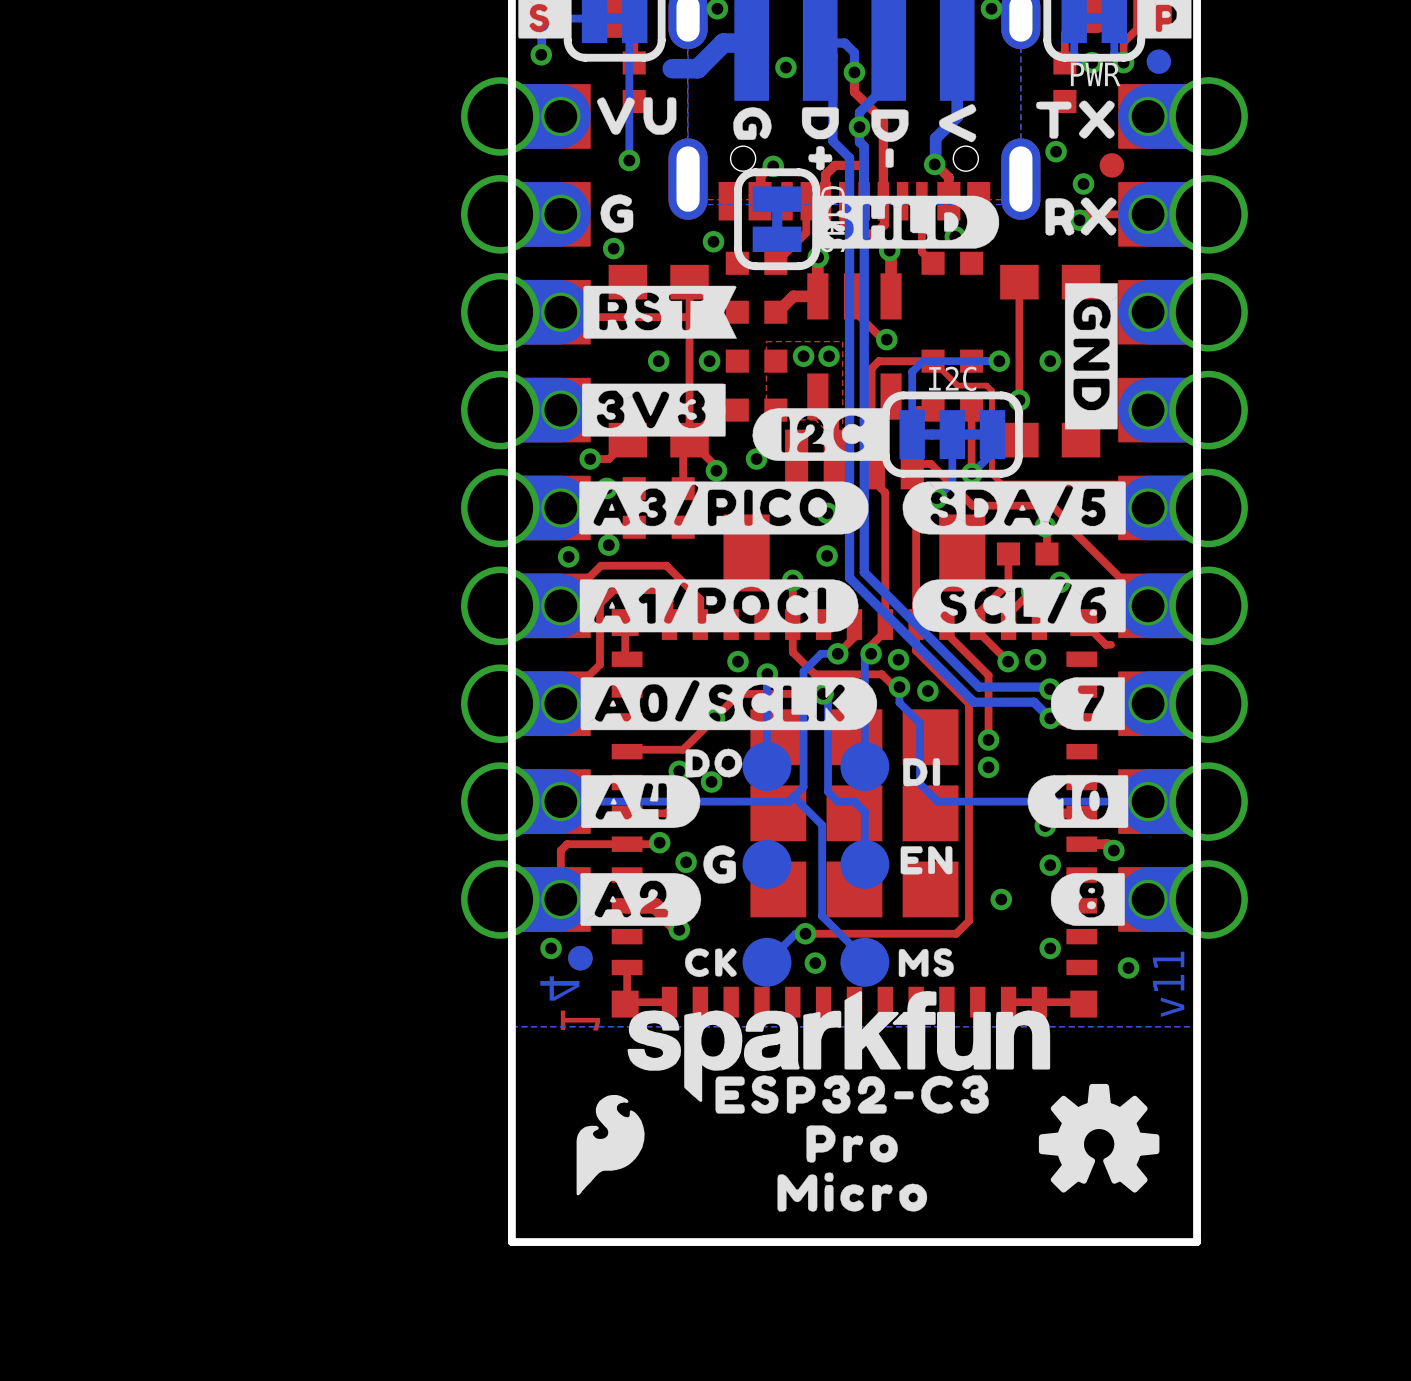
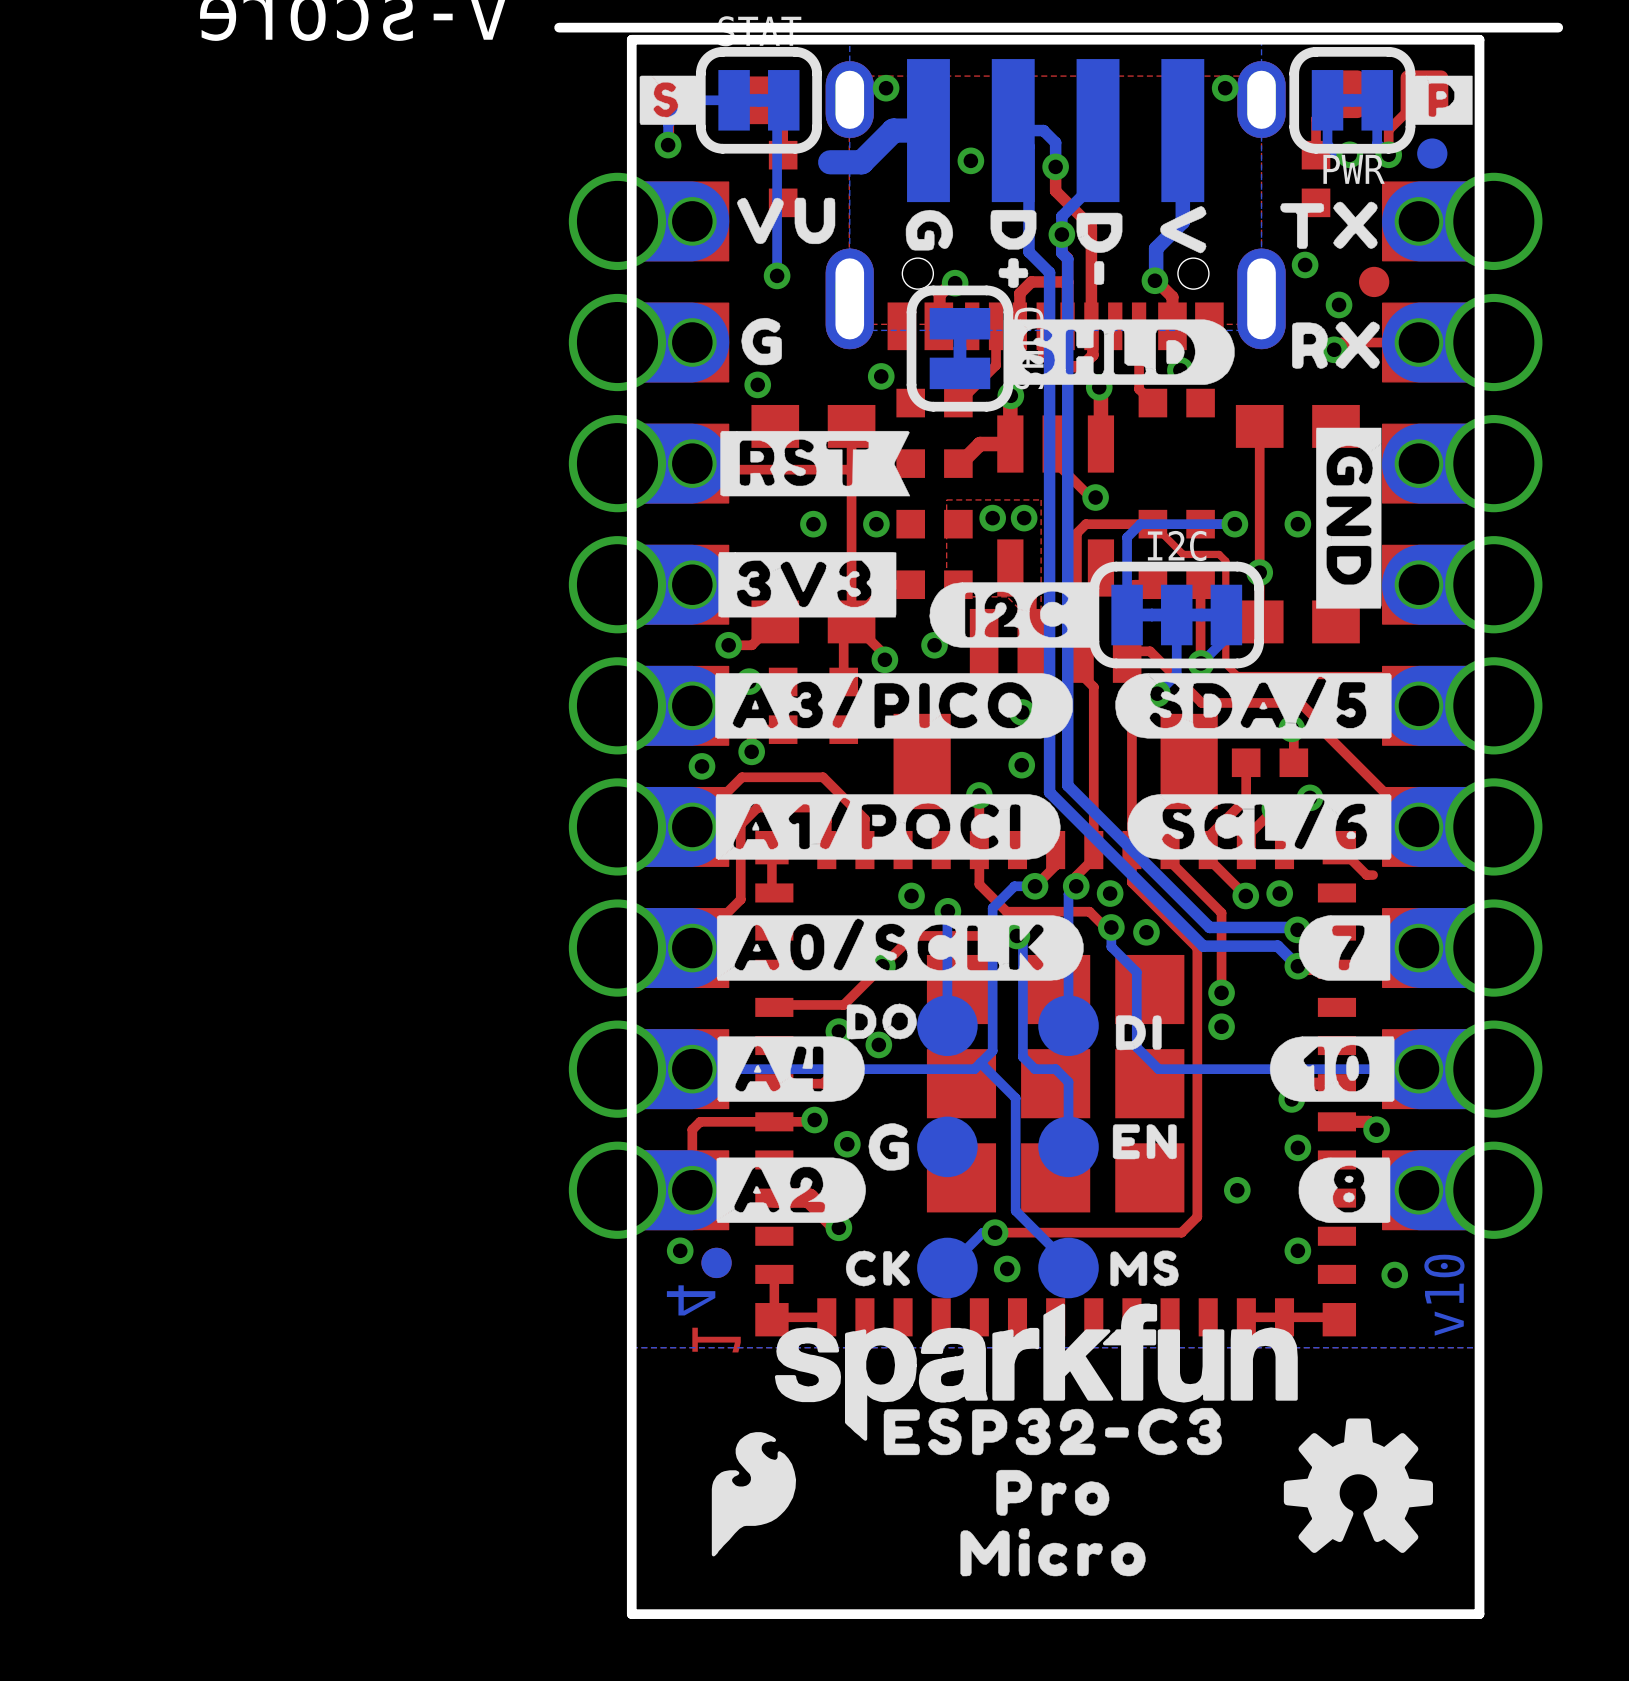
text: v11 (1168, 984) -> v10 (1444, 1295)

